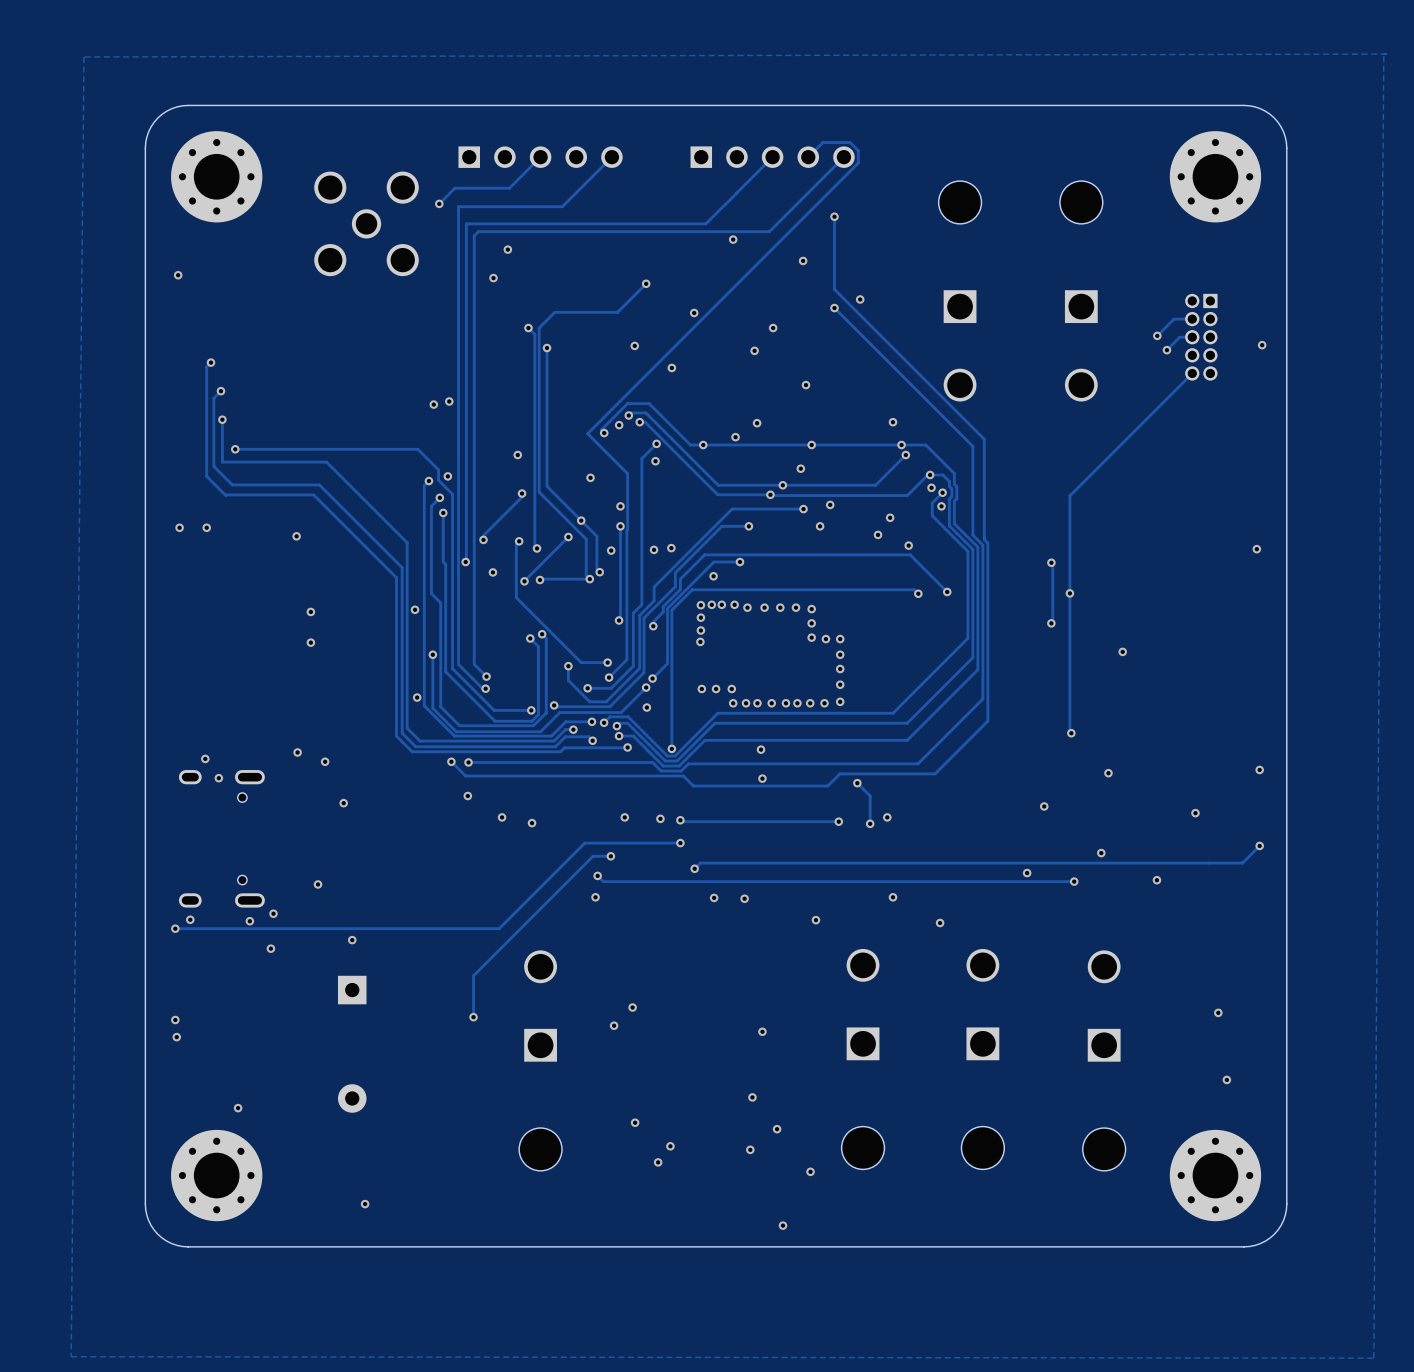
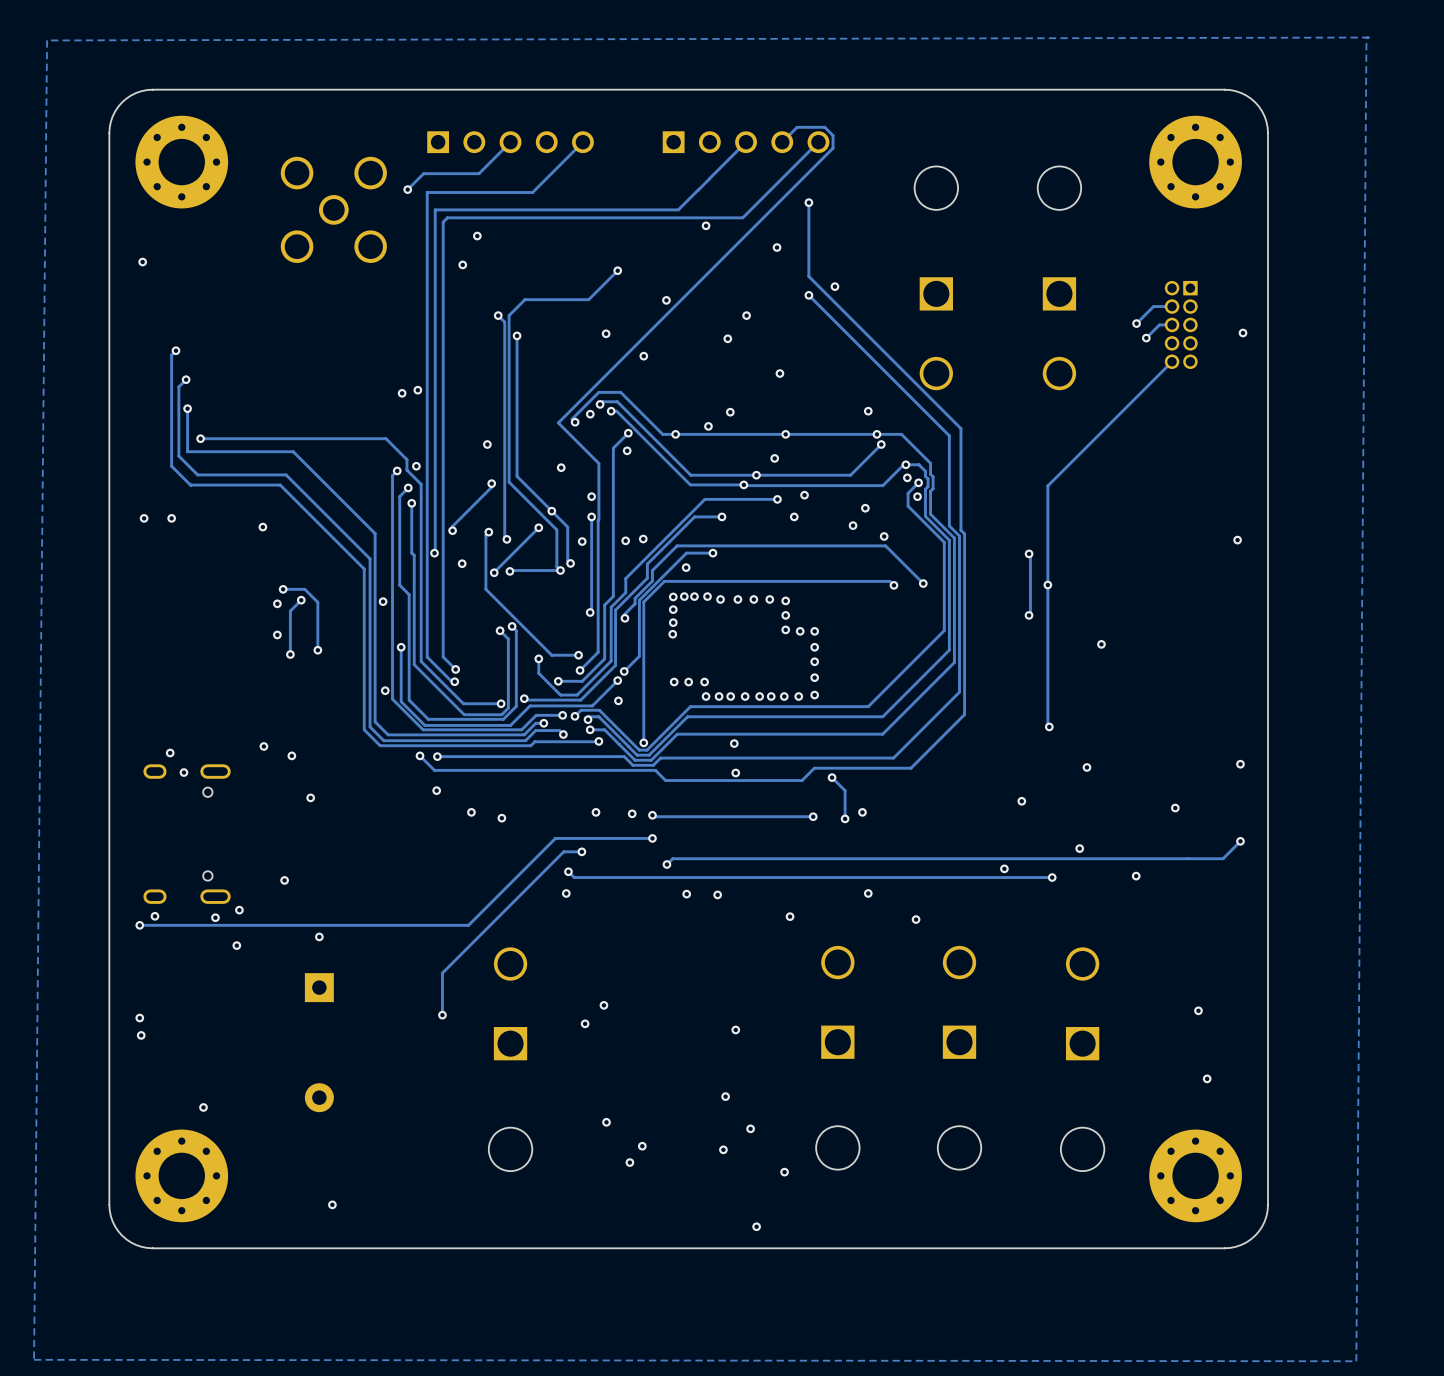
track: none -> (283, 589) (304, 589) (317, 602) (317, 650)
via: none -> (283, 589)
track: none -> (301, 600) (290, 611) (290, 654)
via: none -> (301, 600)
via: none -> (317, 650)
via: none -> (290, 654)

